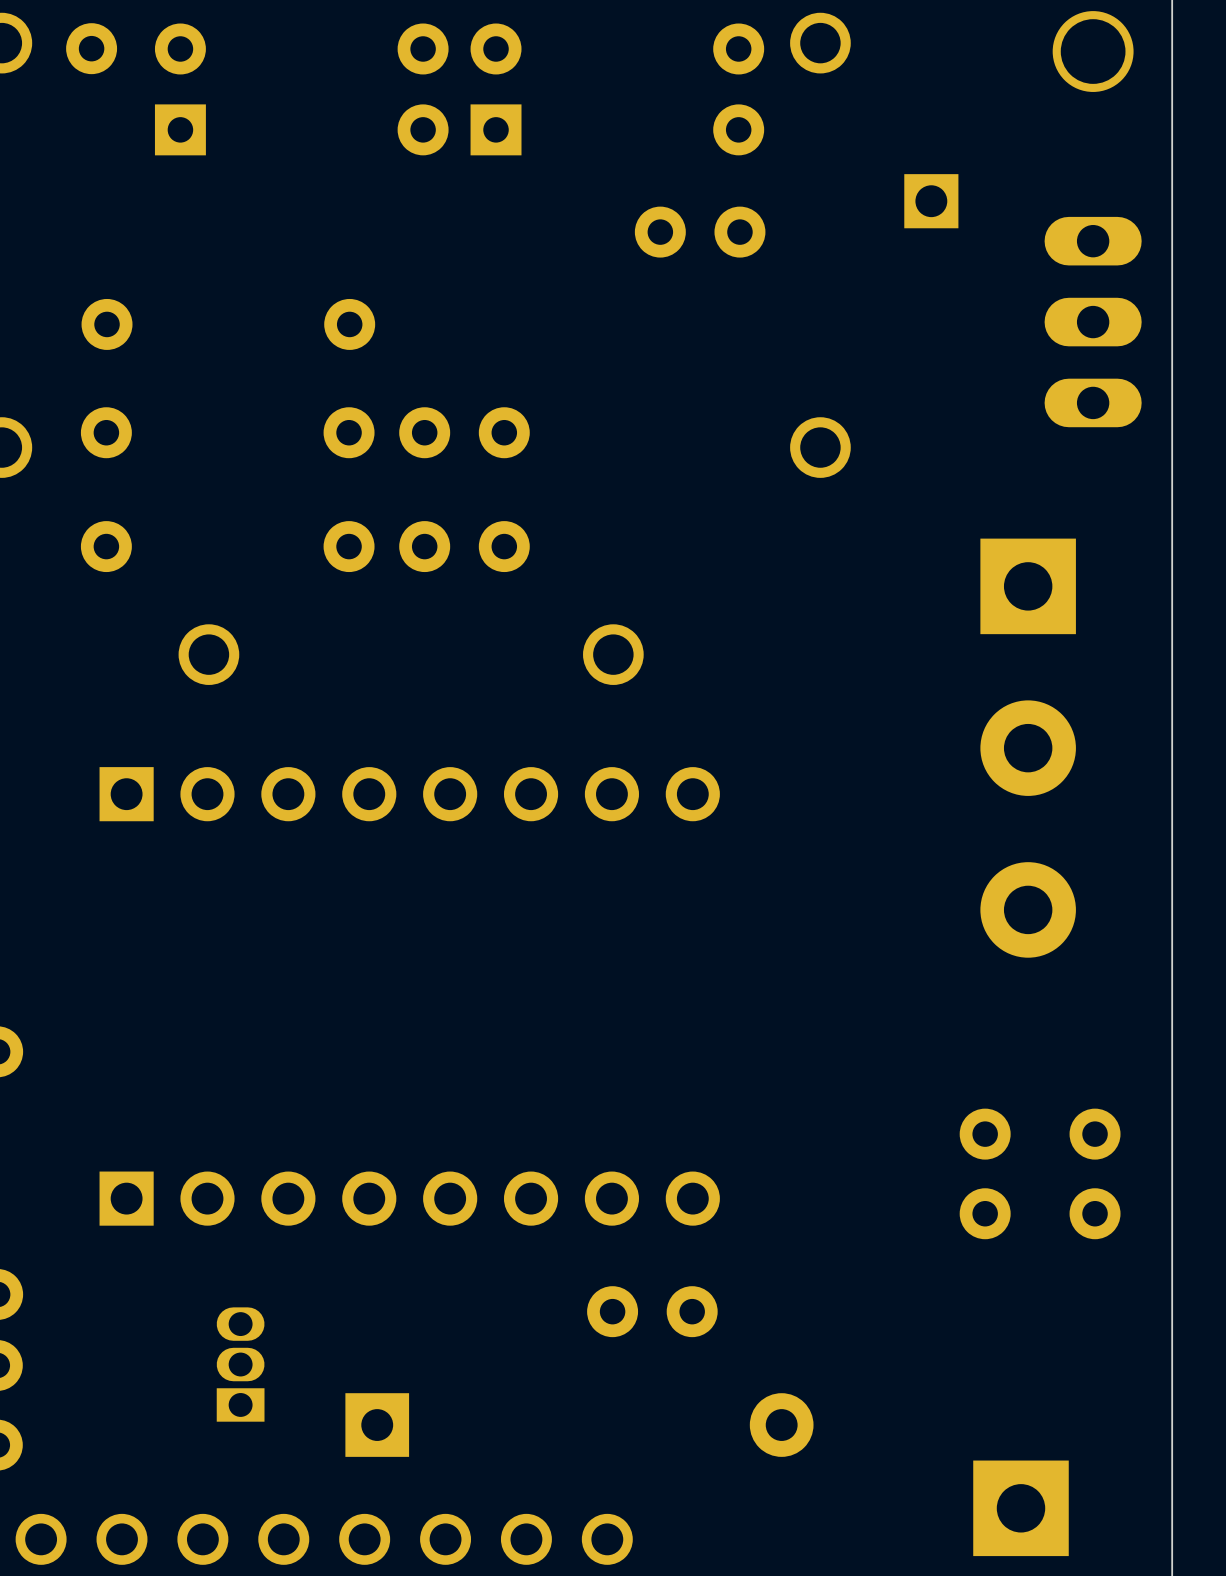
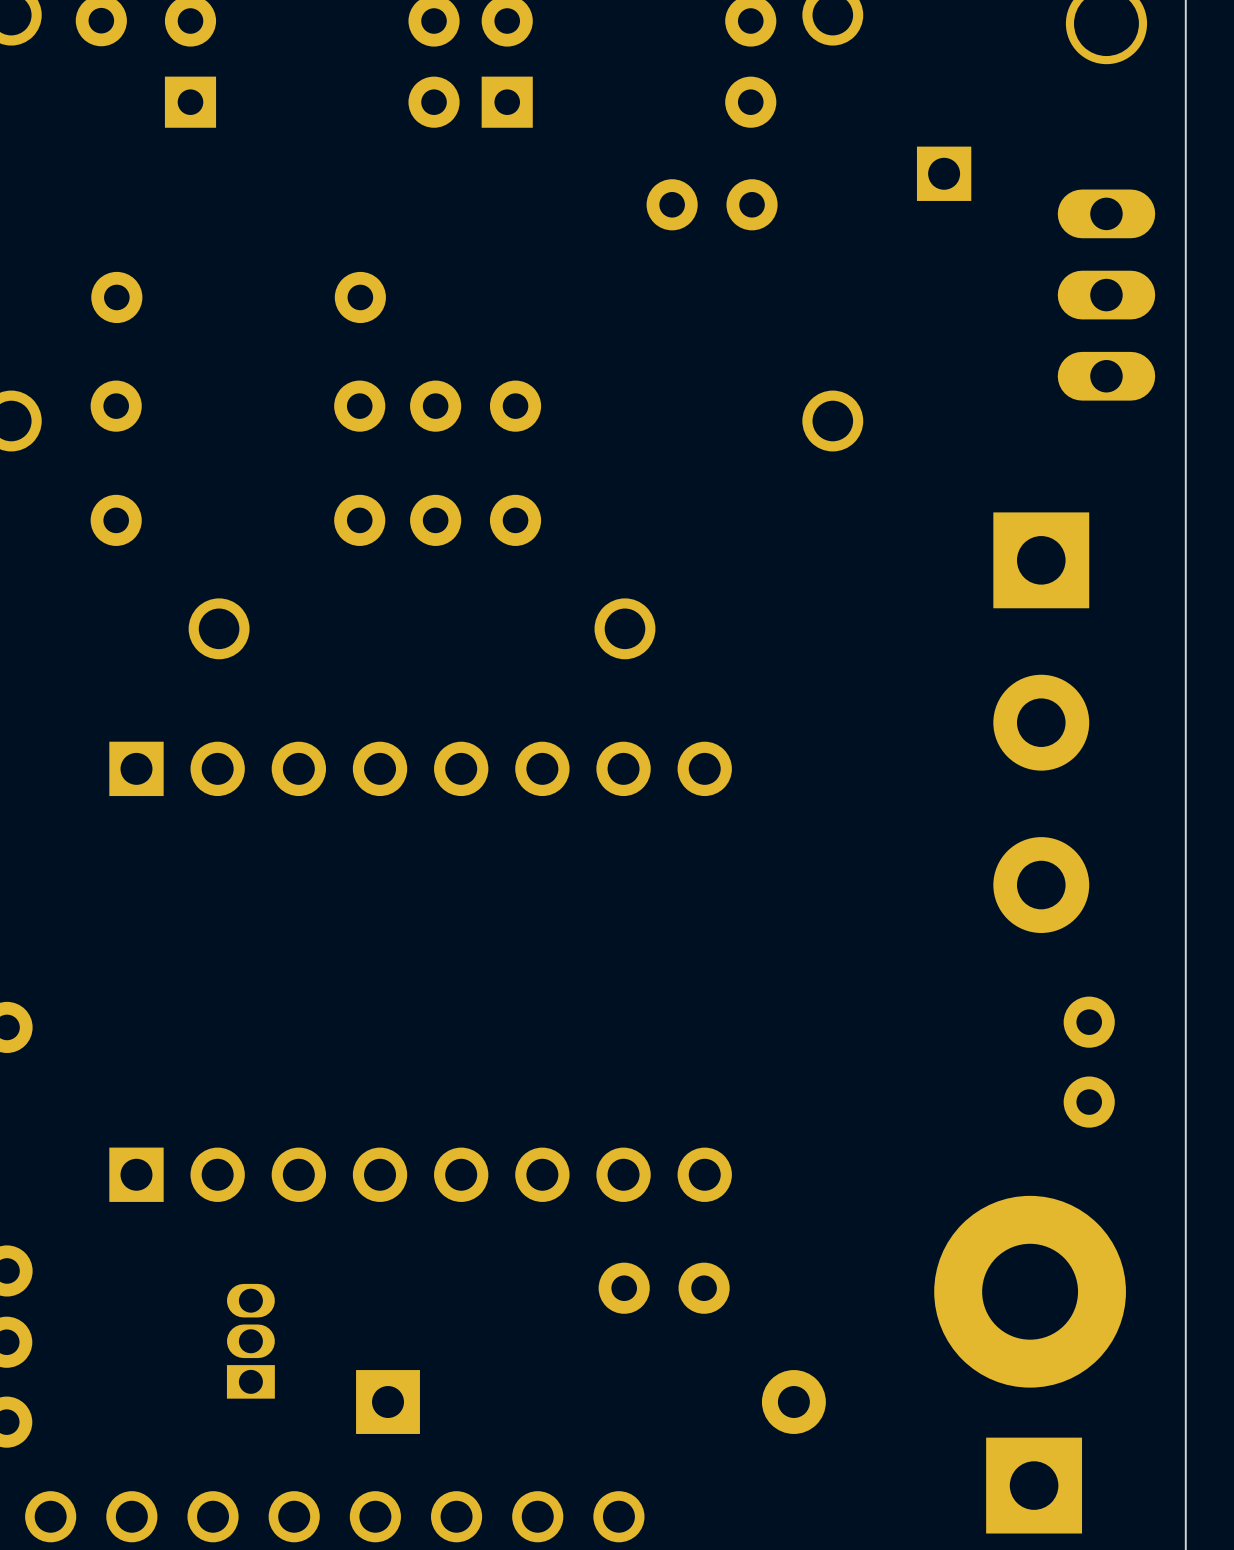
part: none -> (1089, 1062)
part: (985, 1173) -> none
part: (1095, 1173) -> none
part: none -> (1030, 1291)

